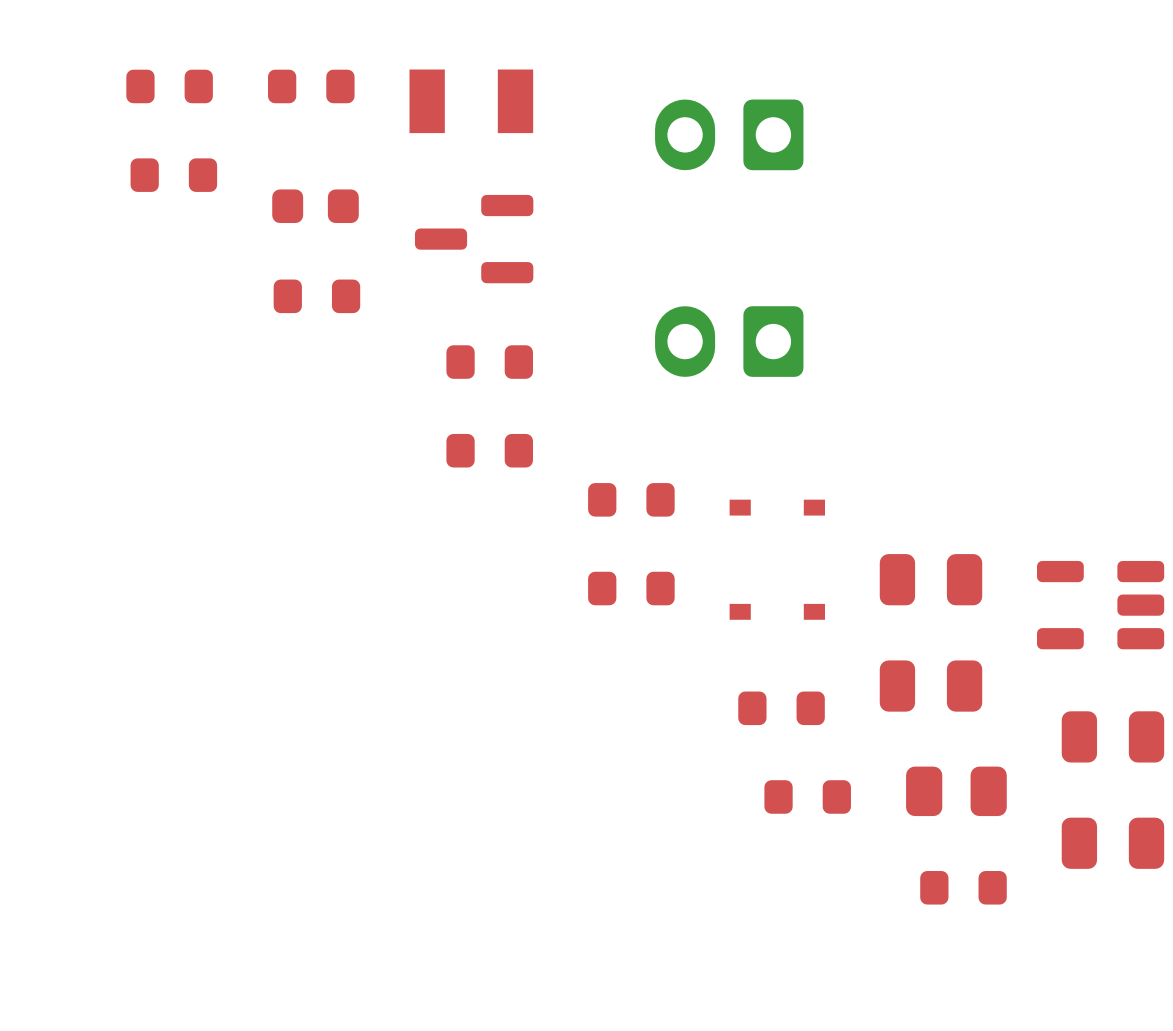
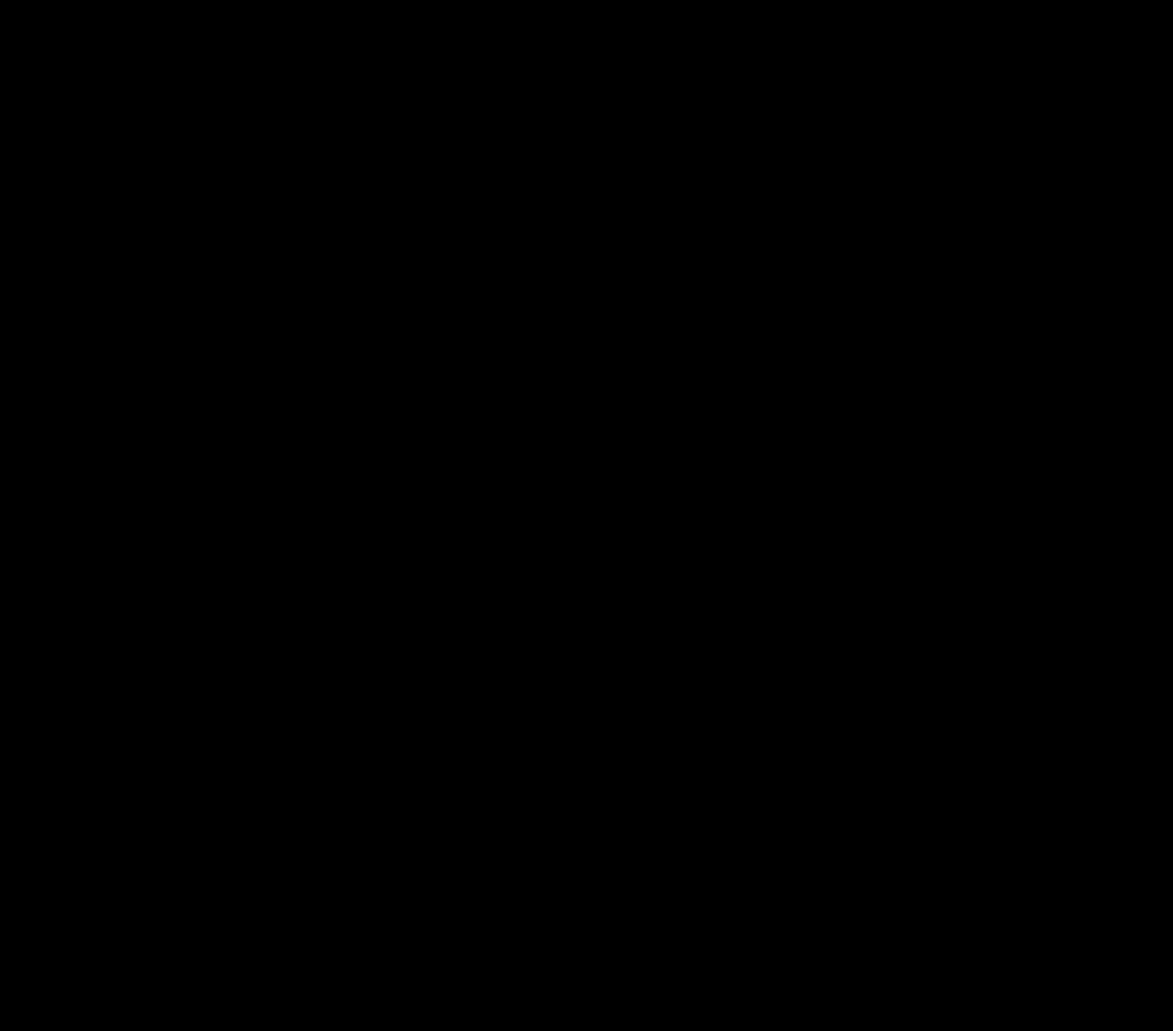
part: (169, 86) -> none
part: (311, 86) -> none
part: (471, 101) -> none
part: (729, 134) -> none
part: (173, 175) -> none
part: (315, 206) -> none
part: (474, 239) -> none
part: (316, 296) -> none
part: (729, 341) -> none
part: (489, 362) -> none
part: (489, 450) -> none
part: (631, 499) -> none
part: (777, 507) -> none
part: (930, 579) -> none
part: (631, 588) -> none
part: (1100, 605) -> none
part: (777, 611) -> none
part: (930, 686) -> none
part: (781, 708) -> none
part: (1112, 736) -> none
part: (956, 791) -> none
part: (807, 796) -> none
part: (1112, 843) -> none
part: (963, 887) -> none

